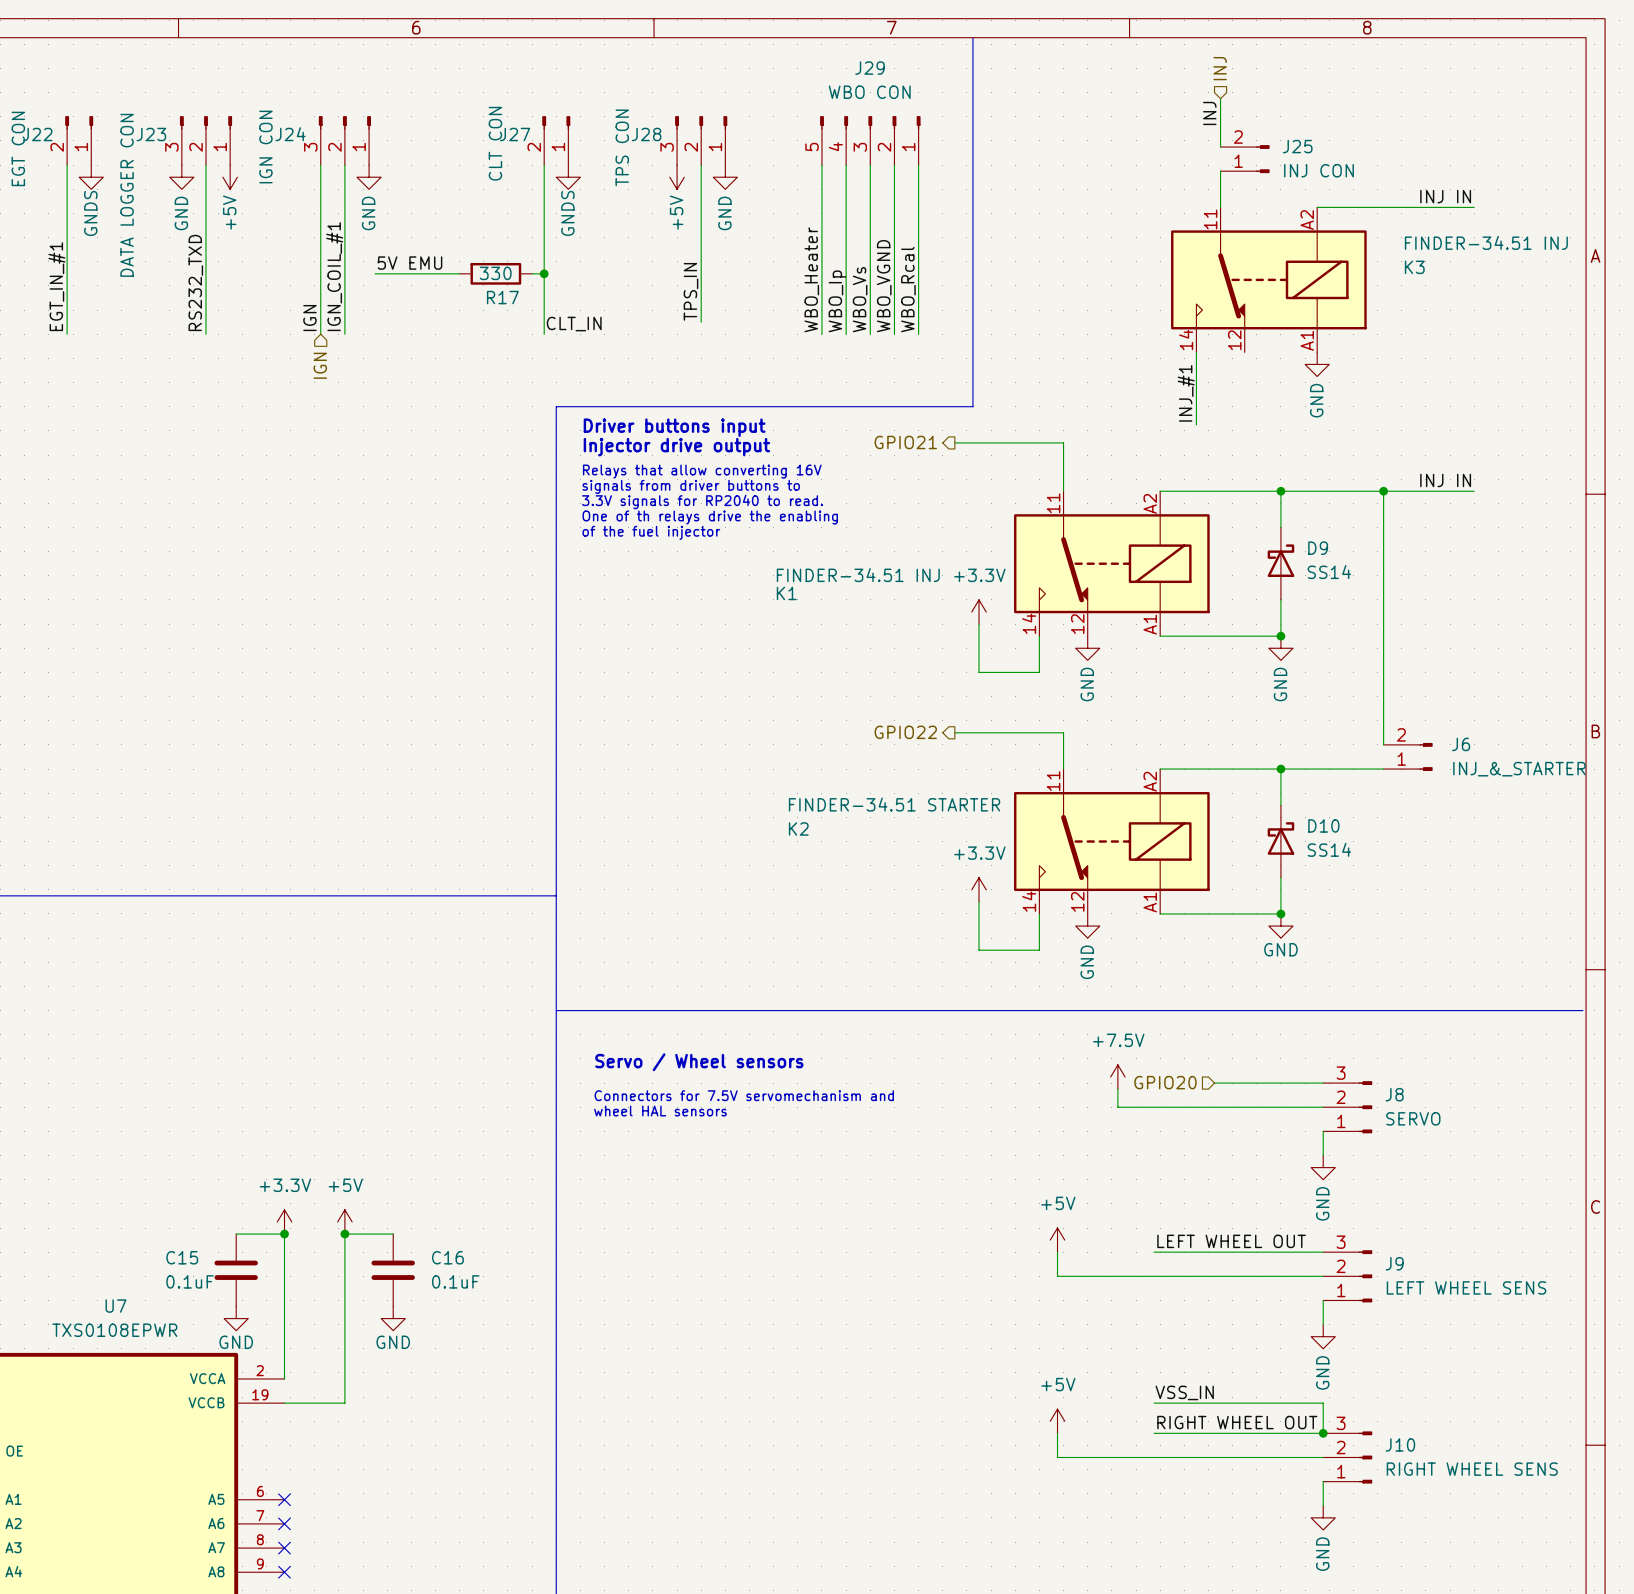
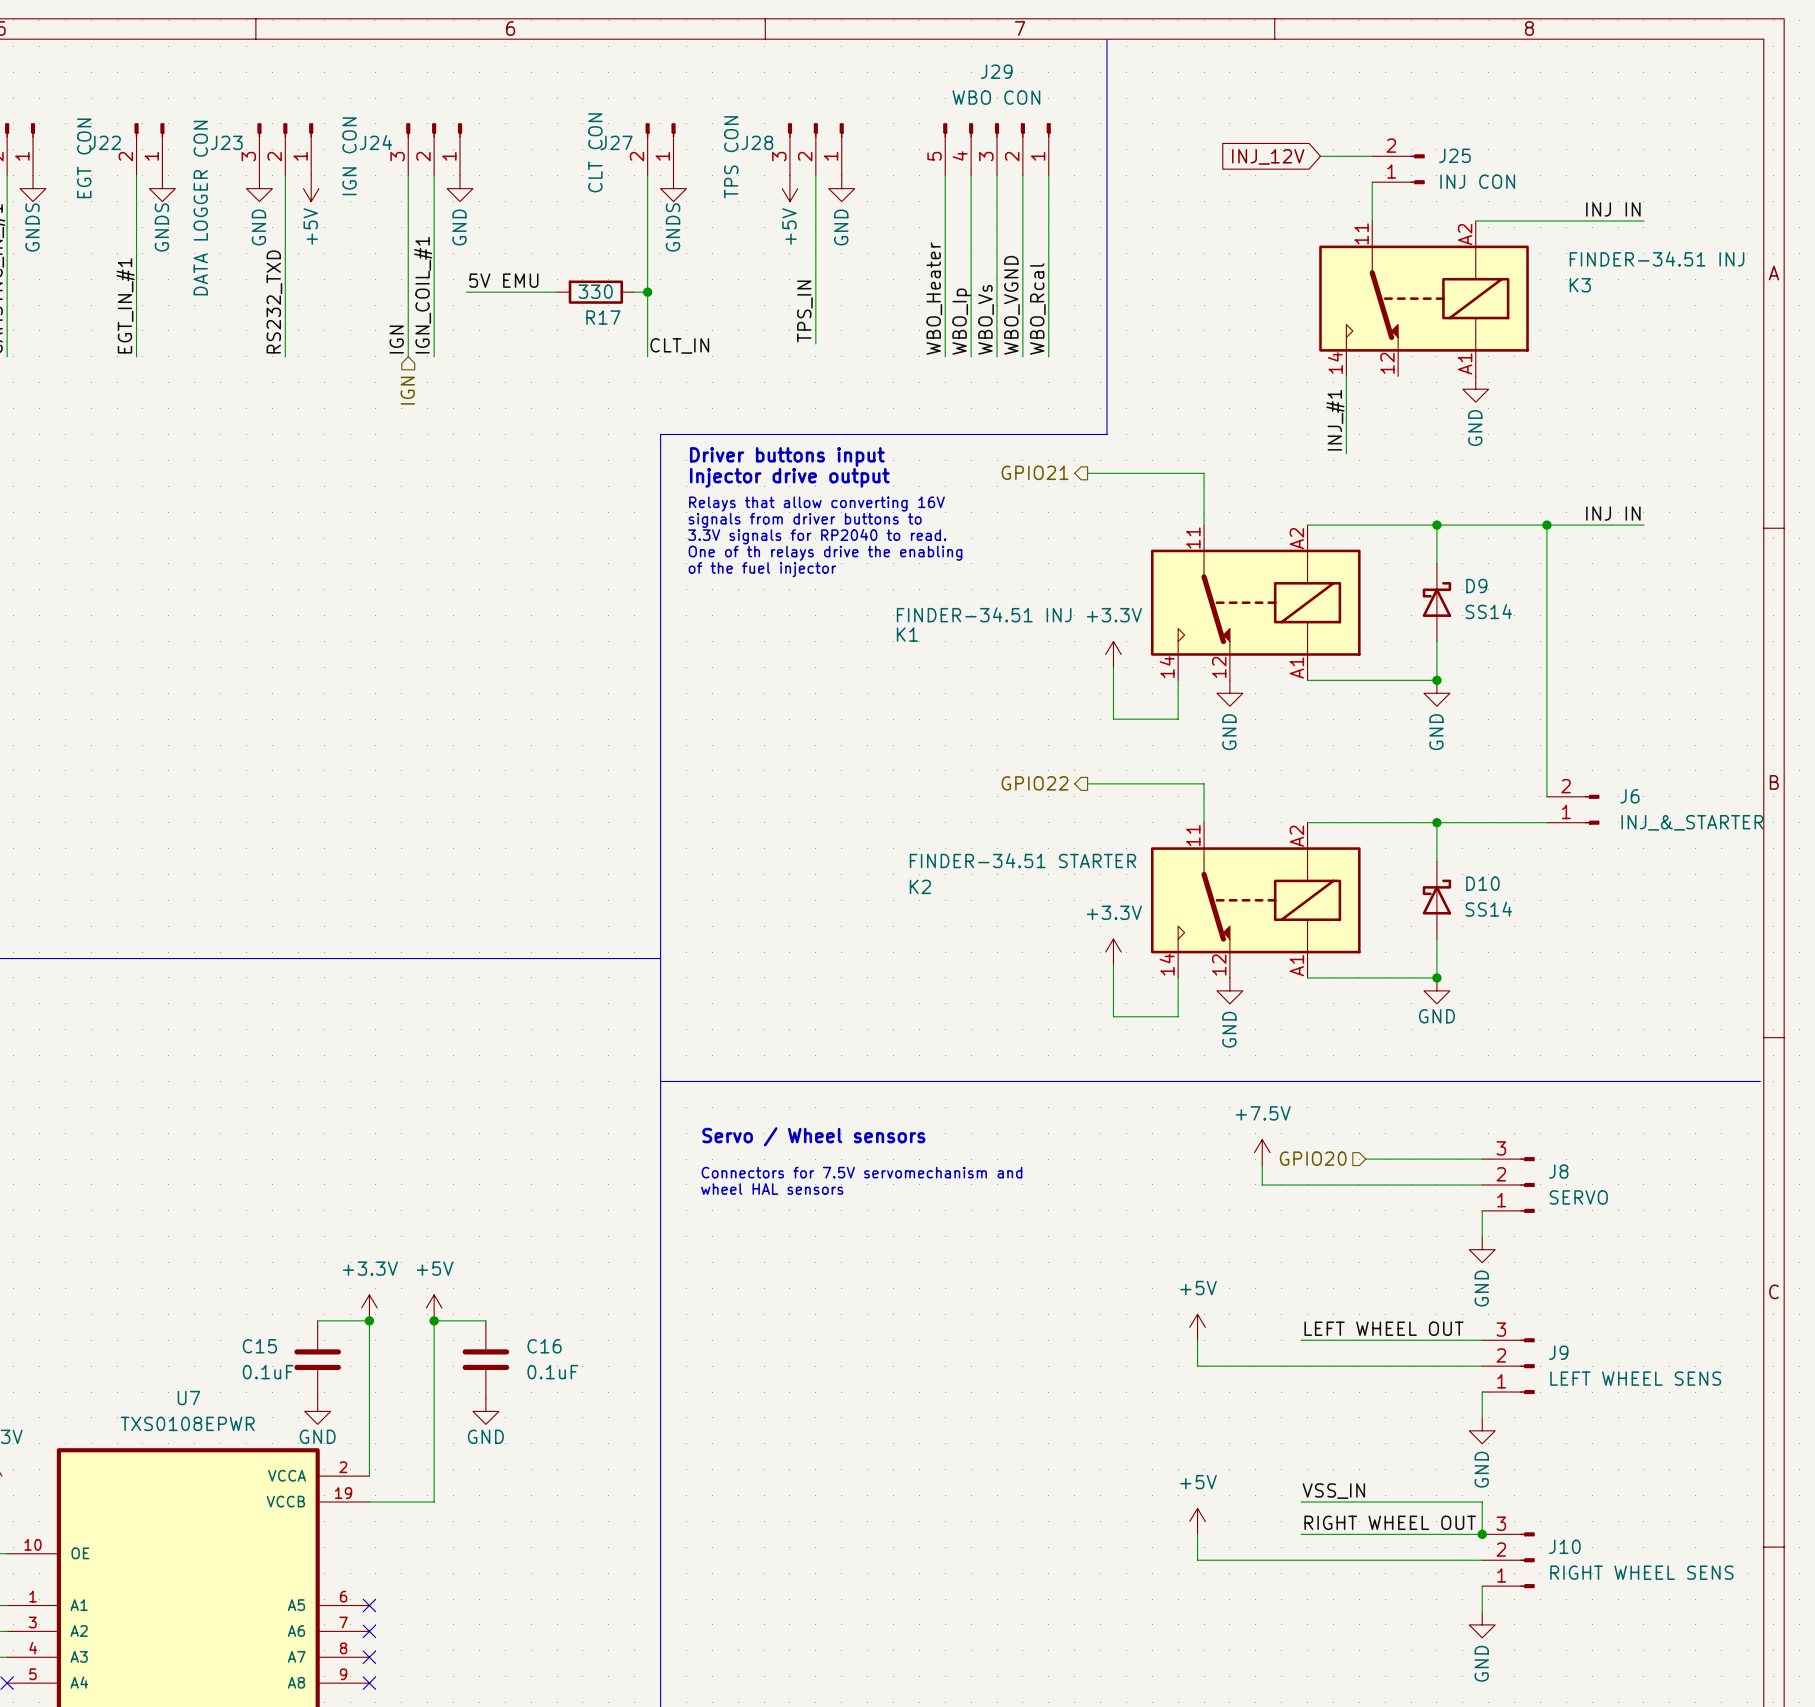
hierarchical label: INJ (1220, 68) -> none
wire: (1220, 98) (1220, 147) -> (1320, 156) (1372, 156)
label: INJ (1209, 113) -> none
global label: none -> INJ_12V (1268, 156)

